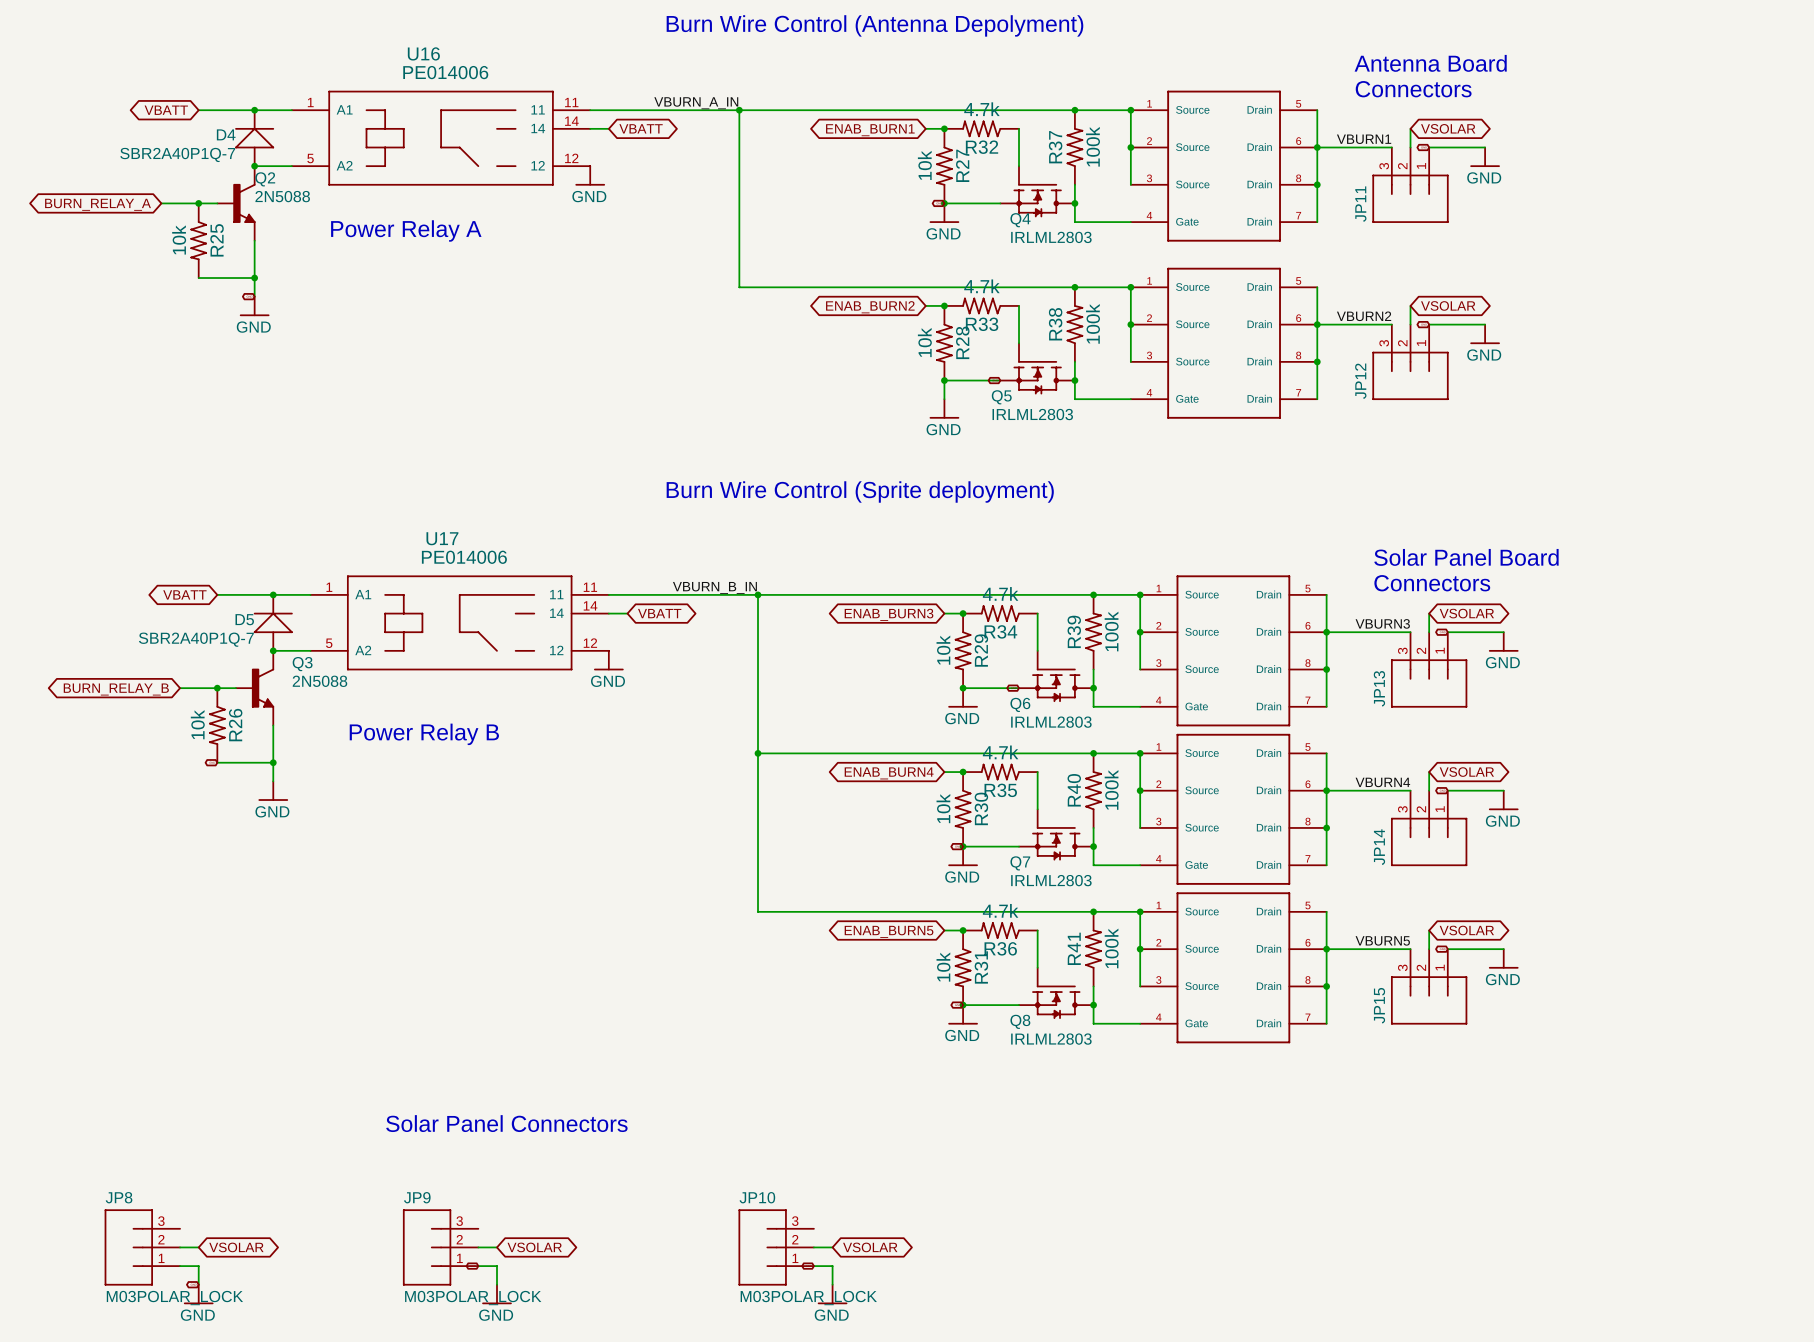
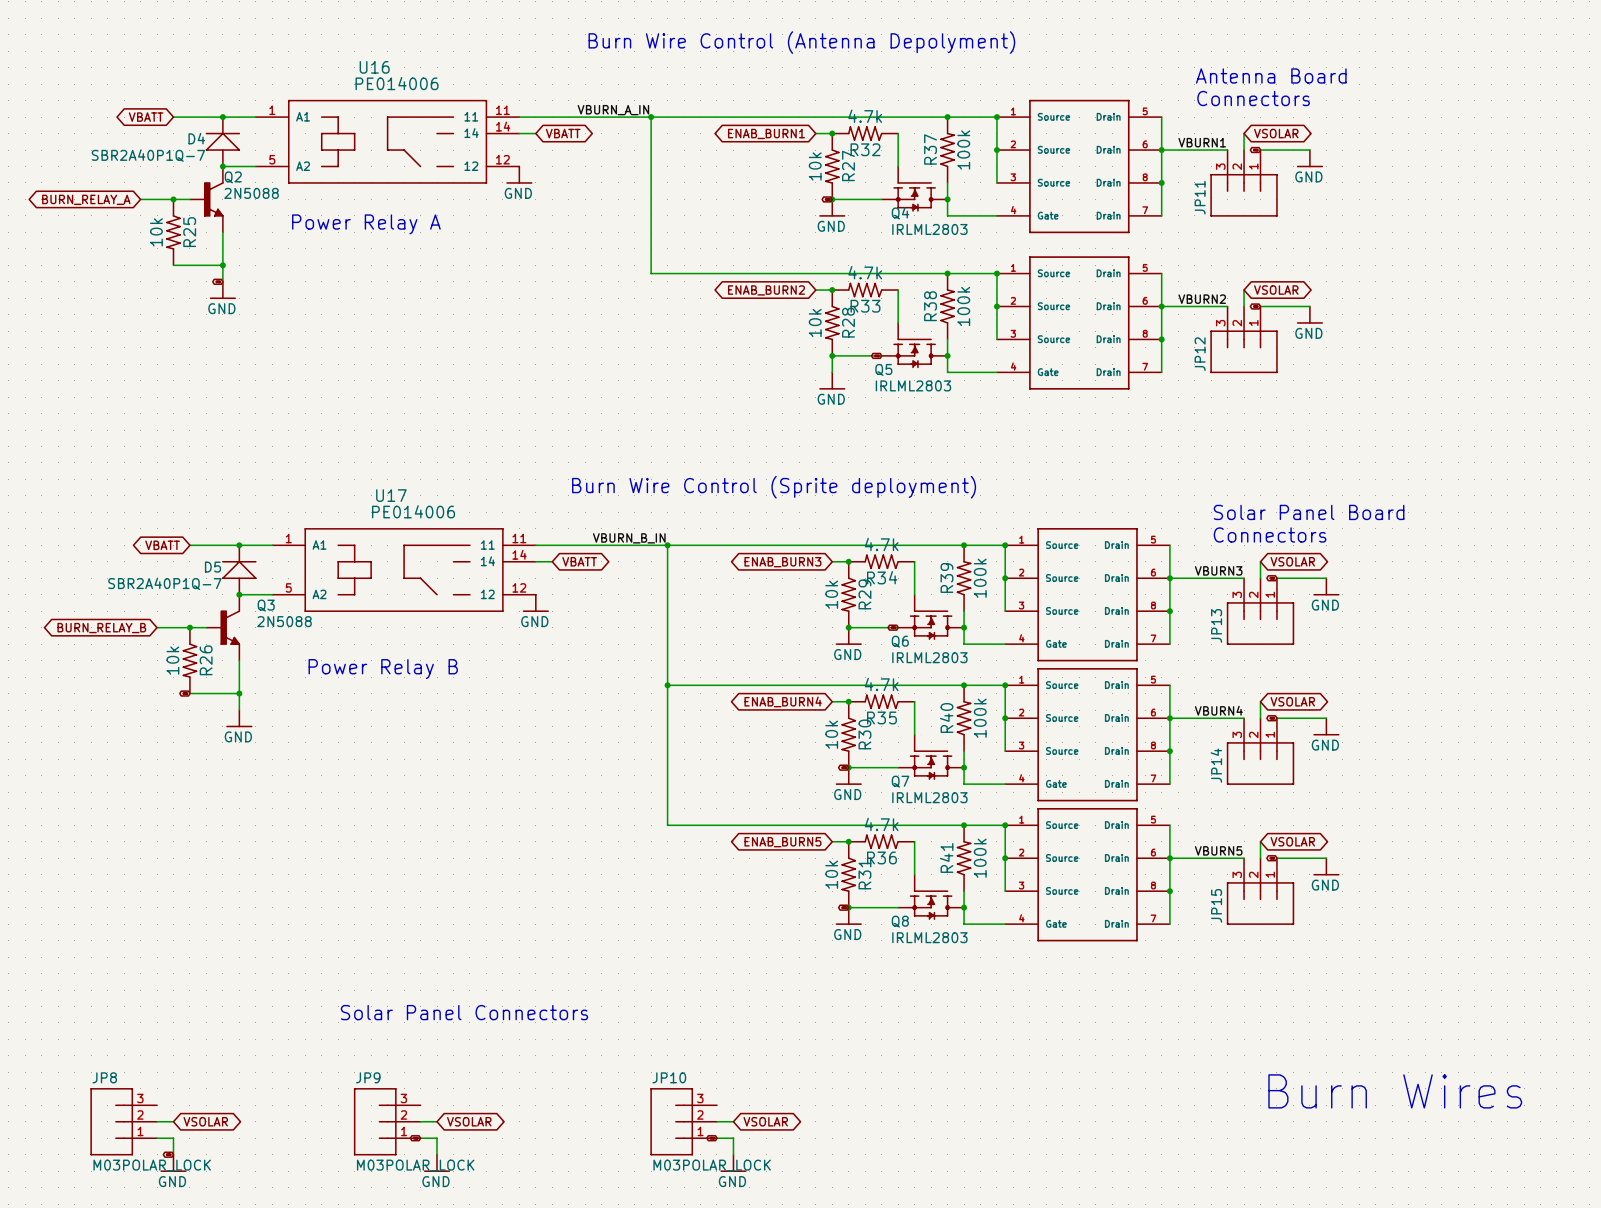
text position: Burn Wire Control (Sprite deployment) (860, 491) -> Burn Wire Control (Sprite deployment) (774, 487)
text: none -> Burn Wires (1395, 1091)

